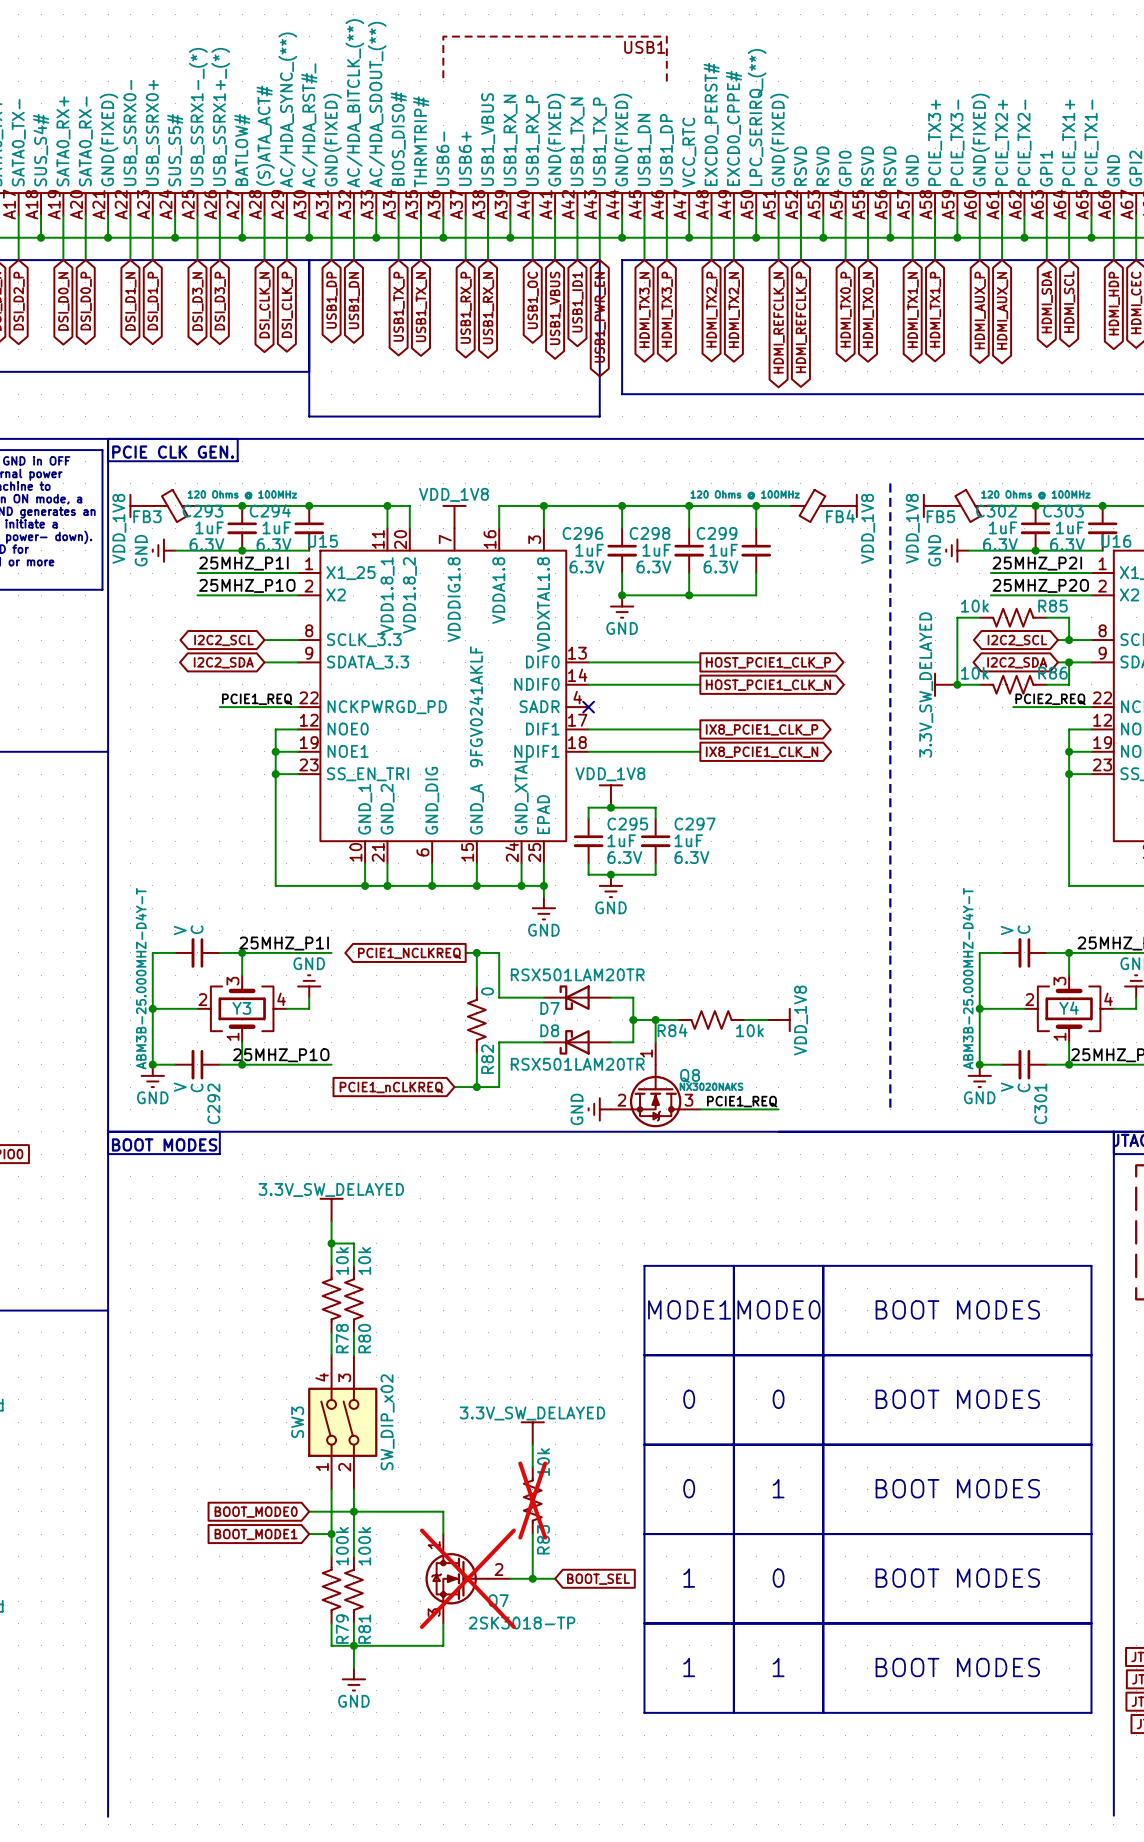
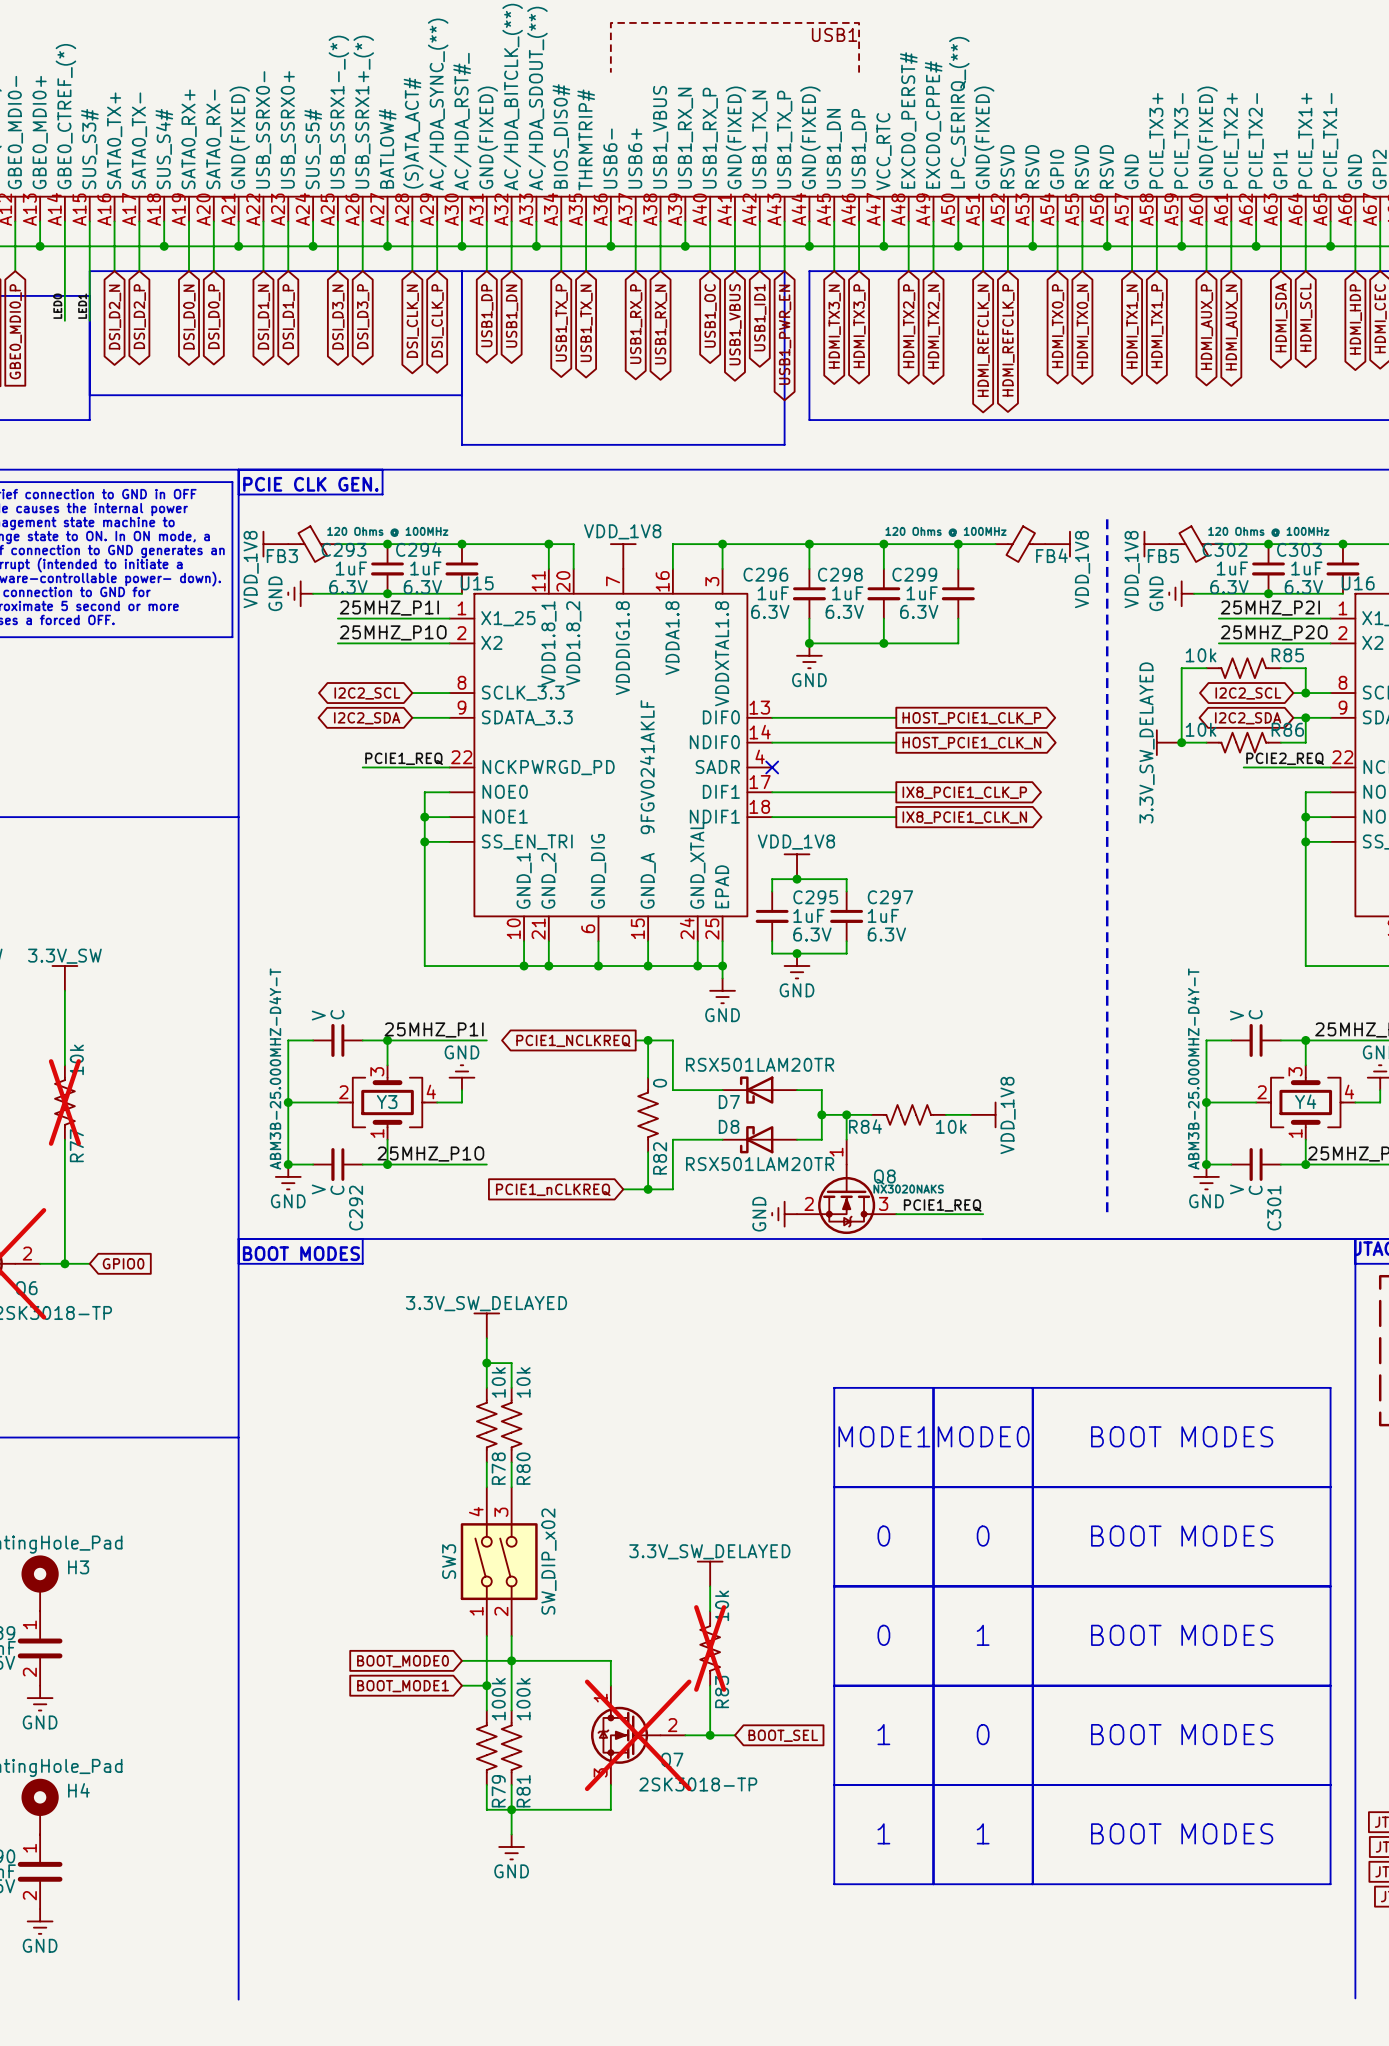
U15 pin number: 12 (309, 720) -> none
U16 pin number: 12 (1102, 720) -> none
U15 pin number: 19 (309, 742) -> none
U16 pin number: 19 (1102, 742) -> none
U15 pin number: 23 (308, 764) -> none
U16 pin number: 23 (1102, 764) -> none

